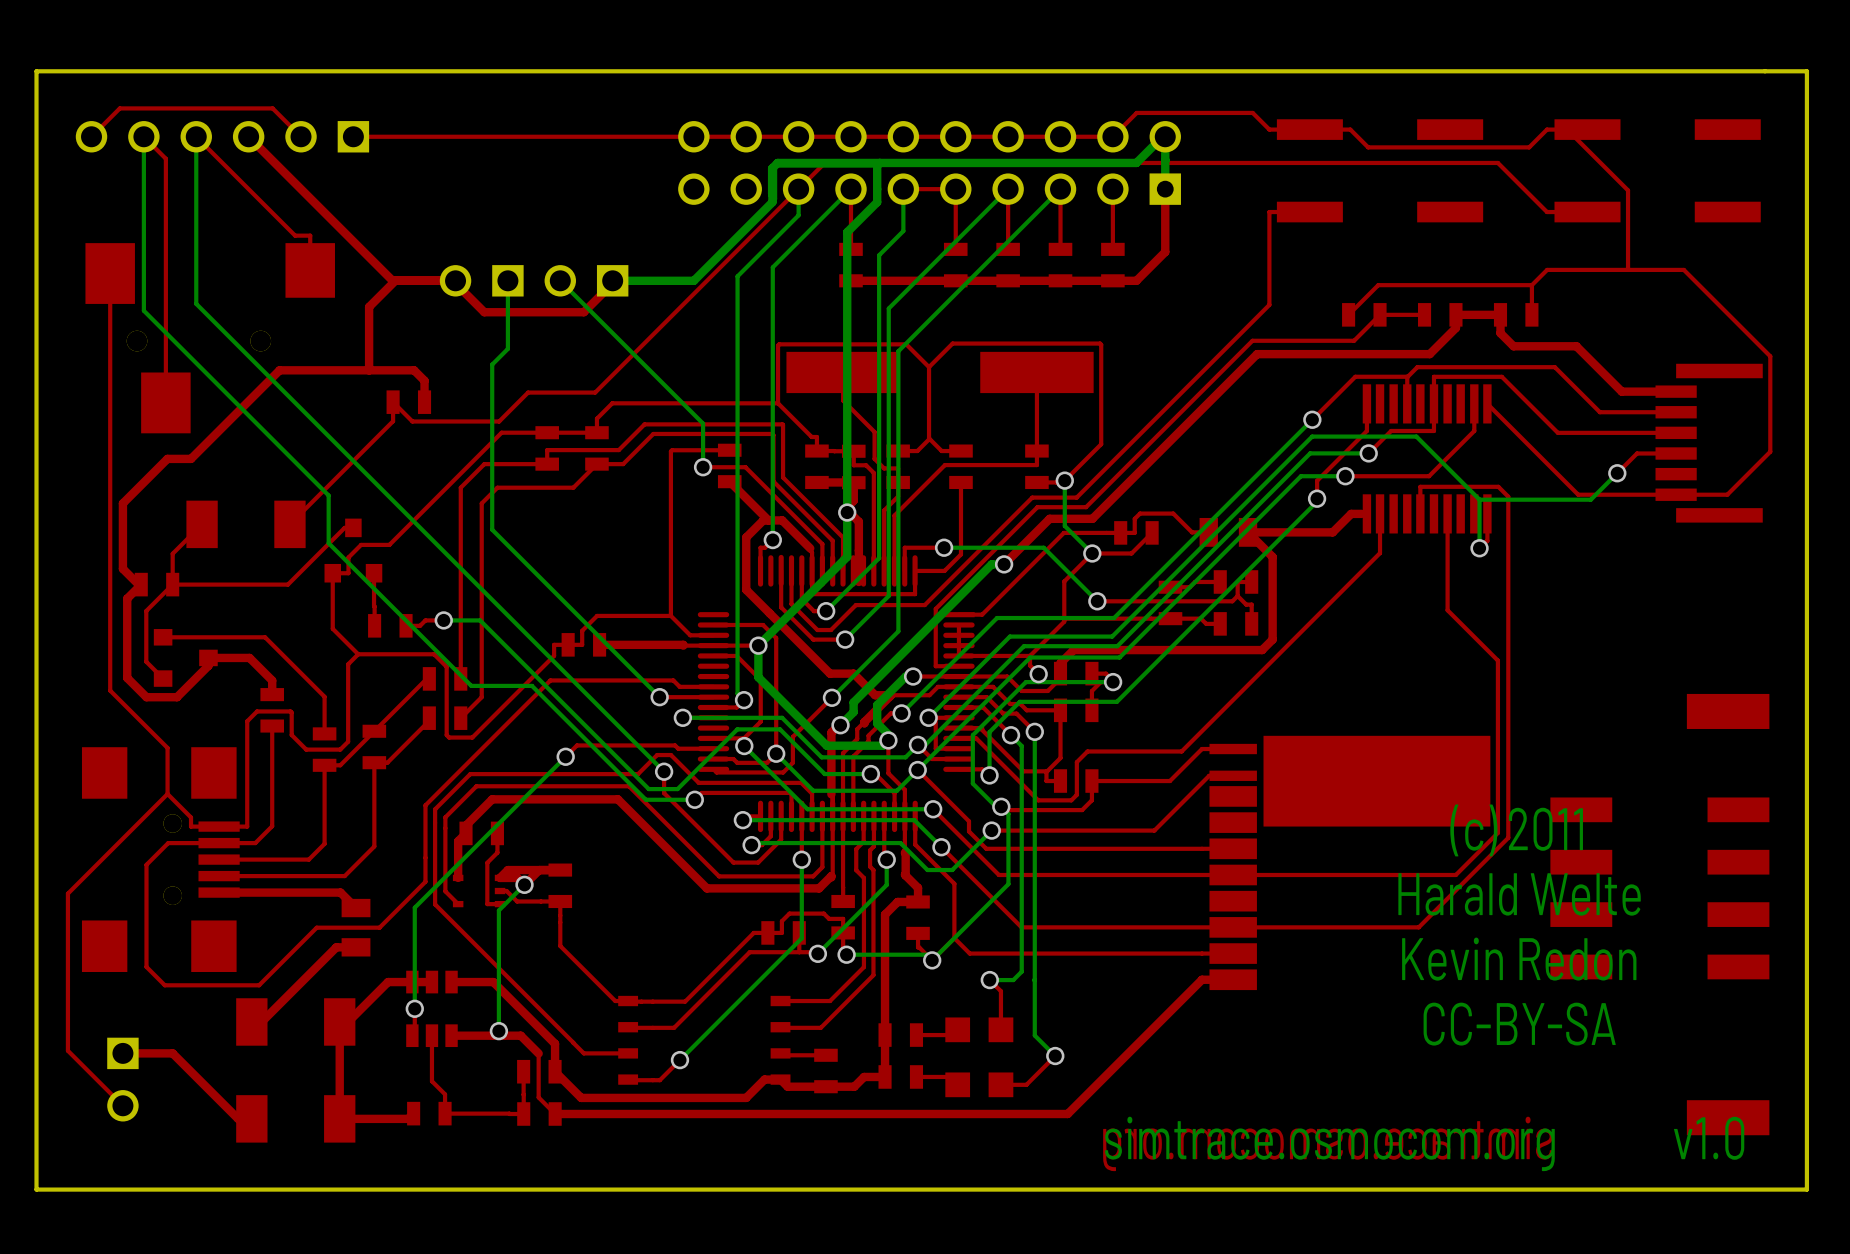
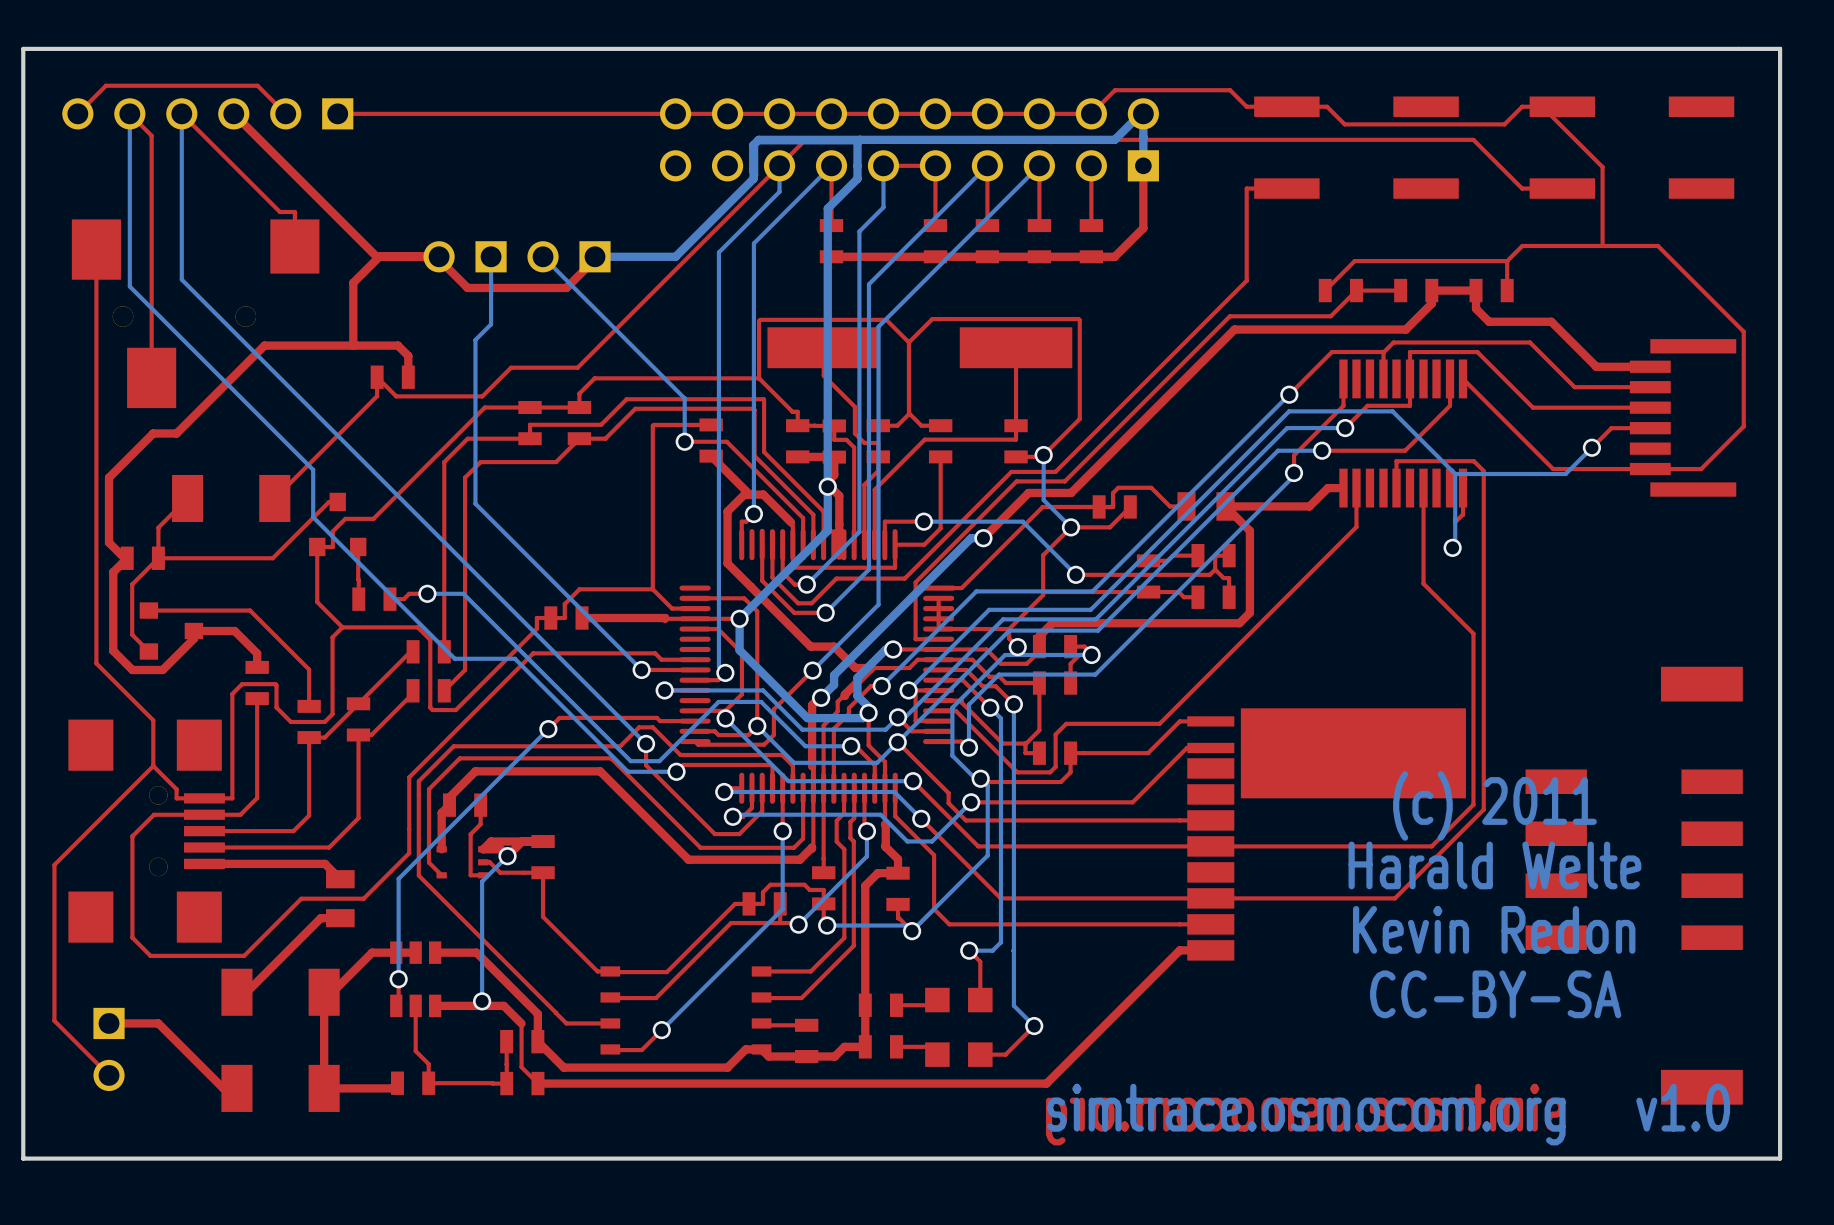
bottom track: none -> (1455, 522) (1455, 545) (1452, 547)
via position: (1479, 548) -> (1452, 547)

